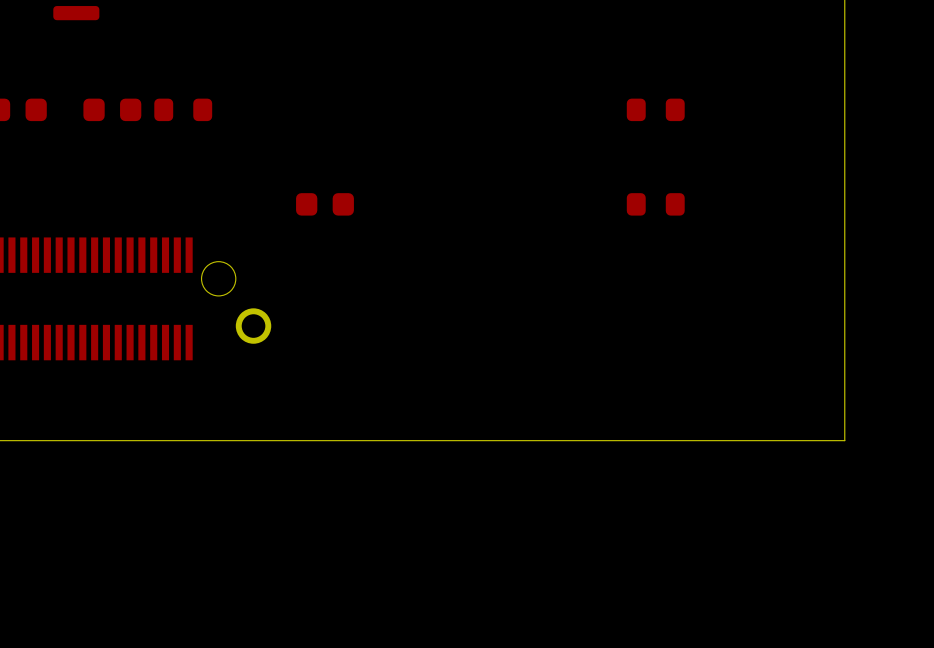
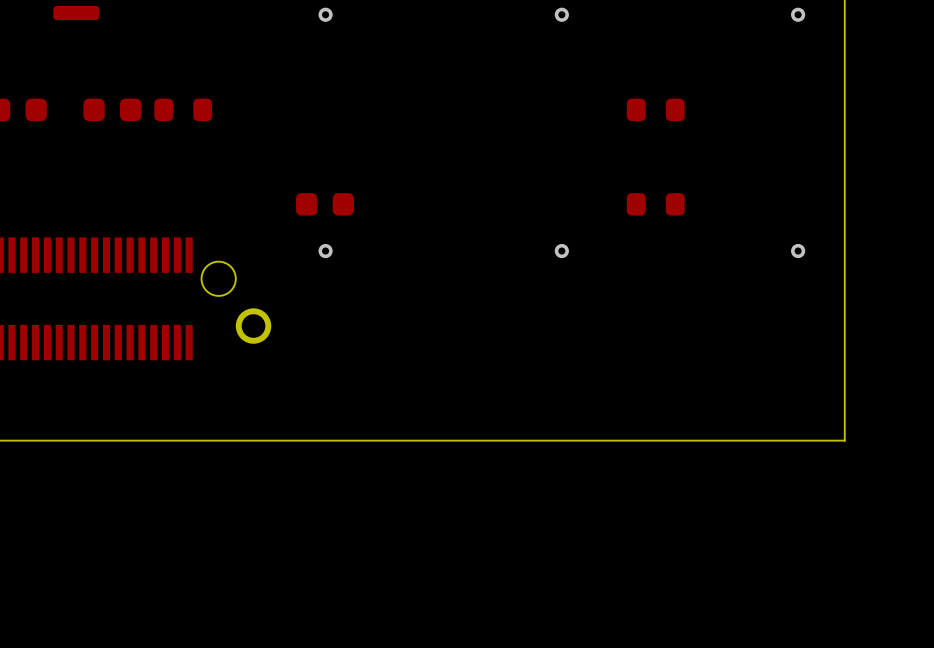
via: none -> (325, 14)
via: none -> (561, 14)
via: none -> (798, 14)
via: none -> (325, 251)
via: none -> (561, 251)
via: none -> (798, 251)

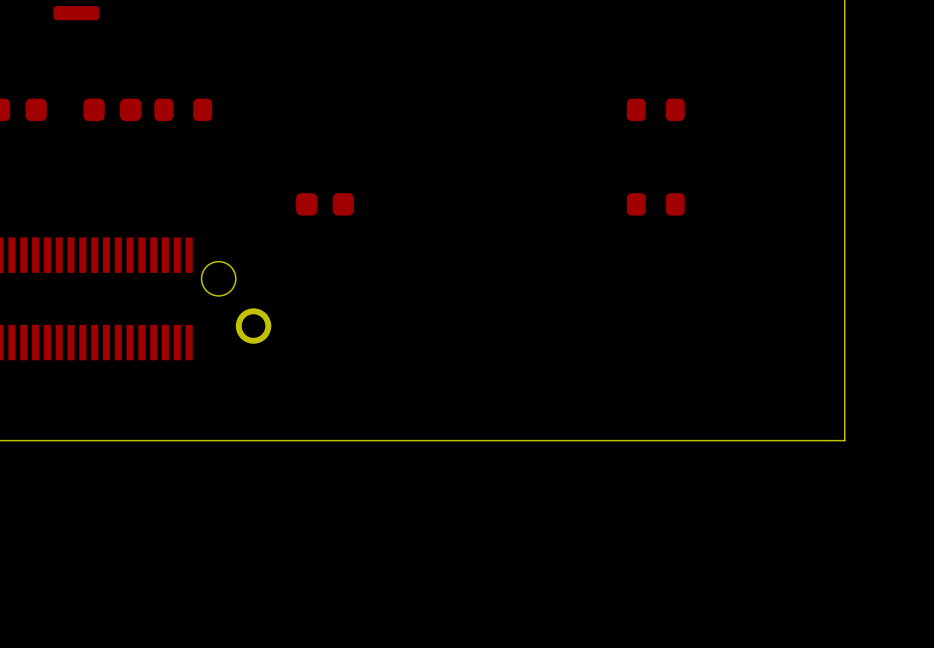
via: (325, 14) -> none
via: (561, 14) -> none
via: (798, 14) -> none
via: (325, 251) -> none
via: (561, 251) -> none
via: (798, 251) -> none

